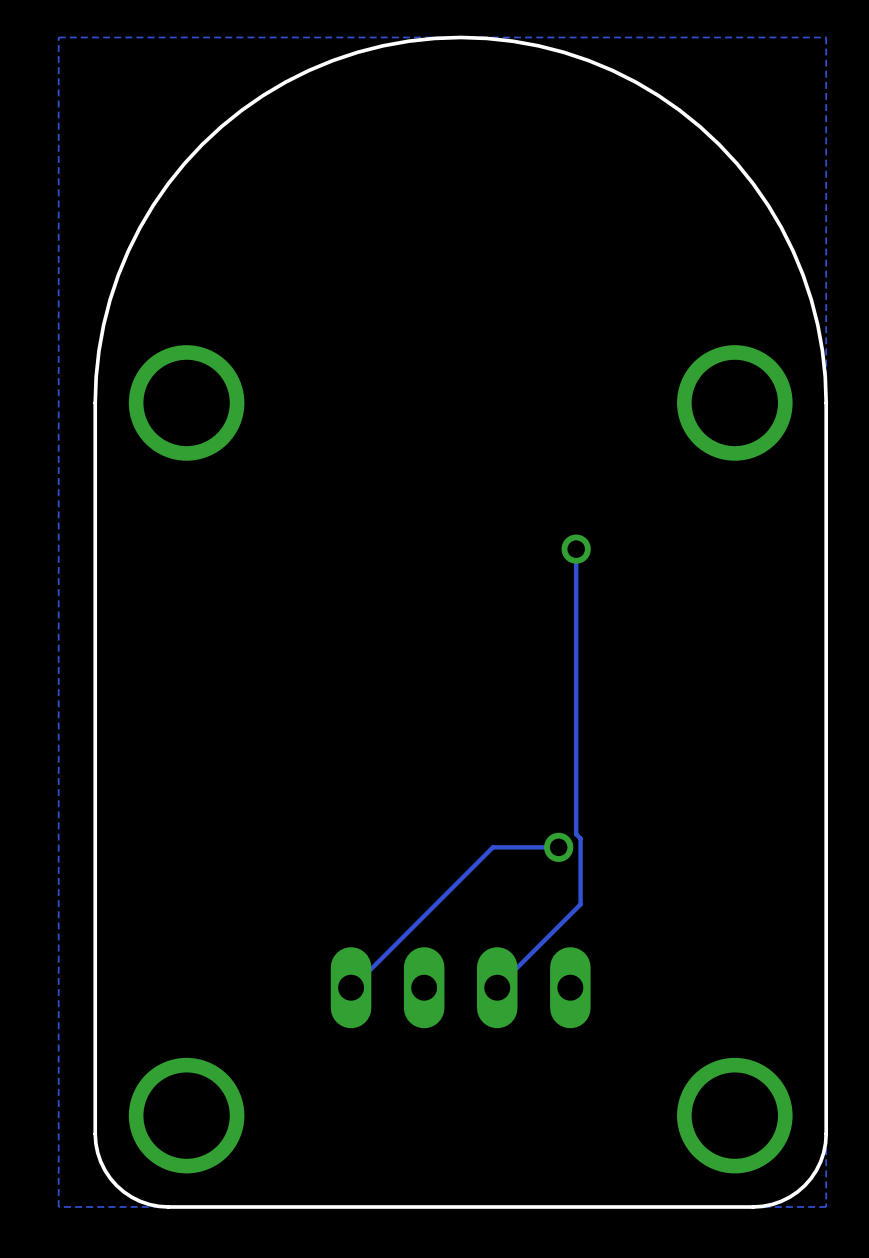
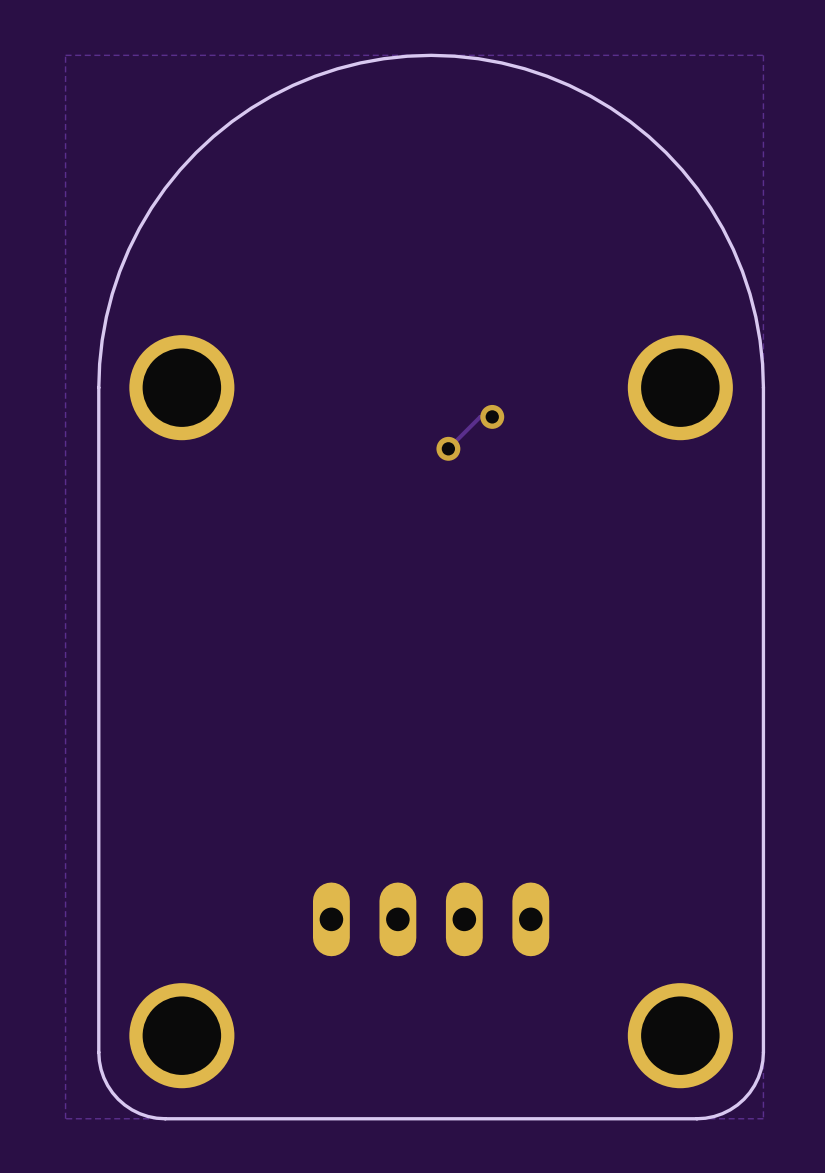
track: none -> (492, 416) (480, 416) (448, 448)
via: none -> (492, 416)
via: none -> (448, 448)
track: (576, 549) (576, 834) (580, 838) (580, 904) (497, 987) -> none
via: (576, 549) -> none
track: (558, 847) (492, 847) (351, 987) -> none
via: (558, 847) -> none

